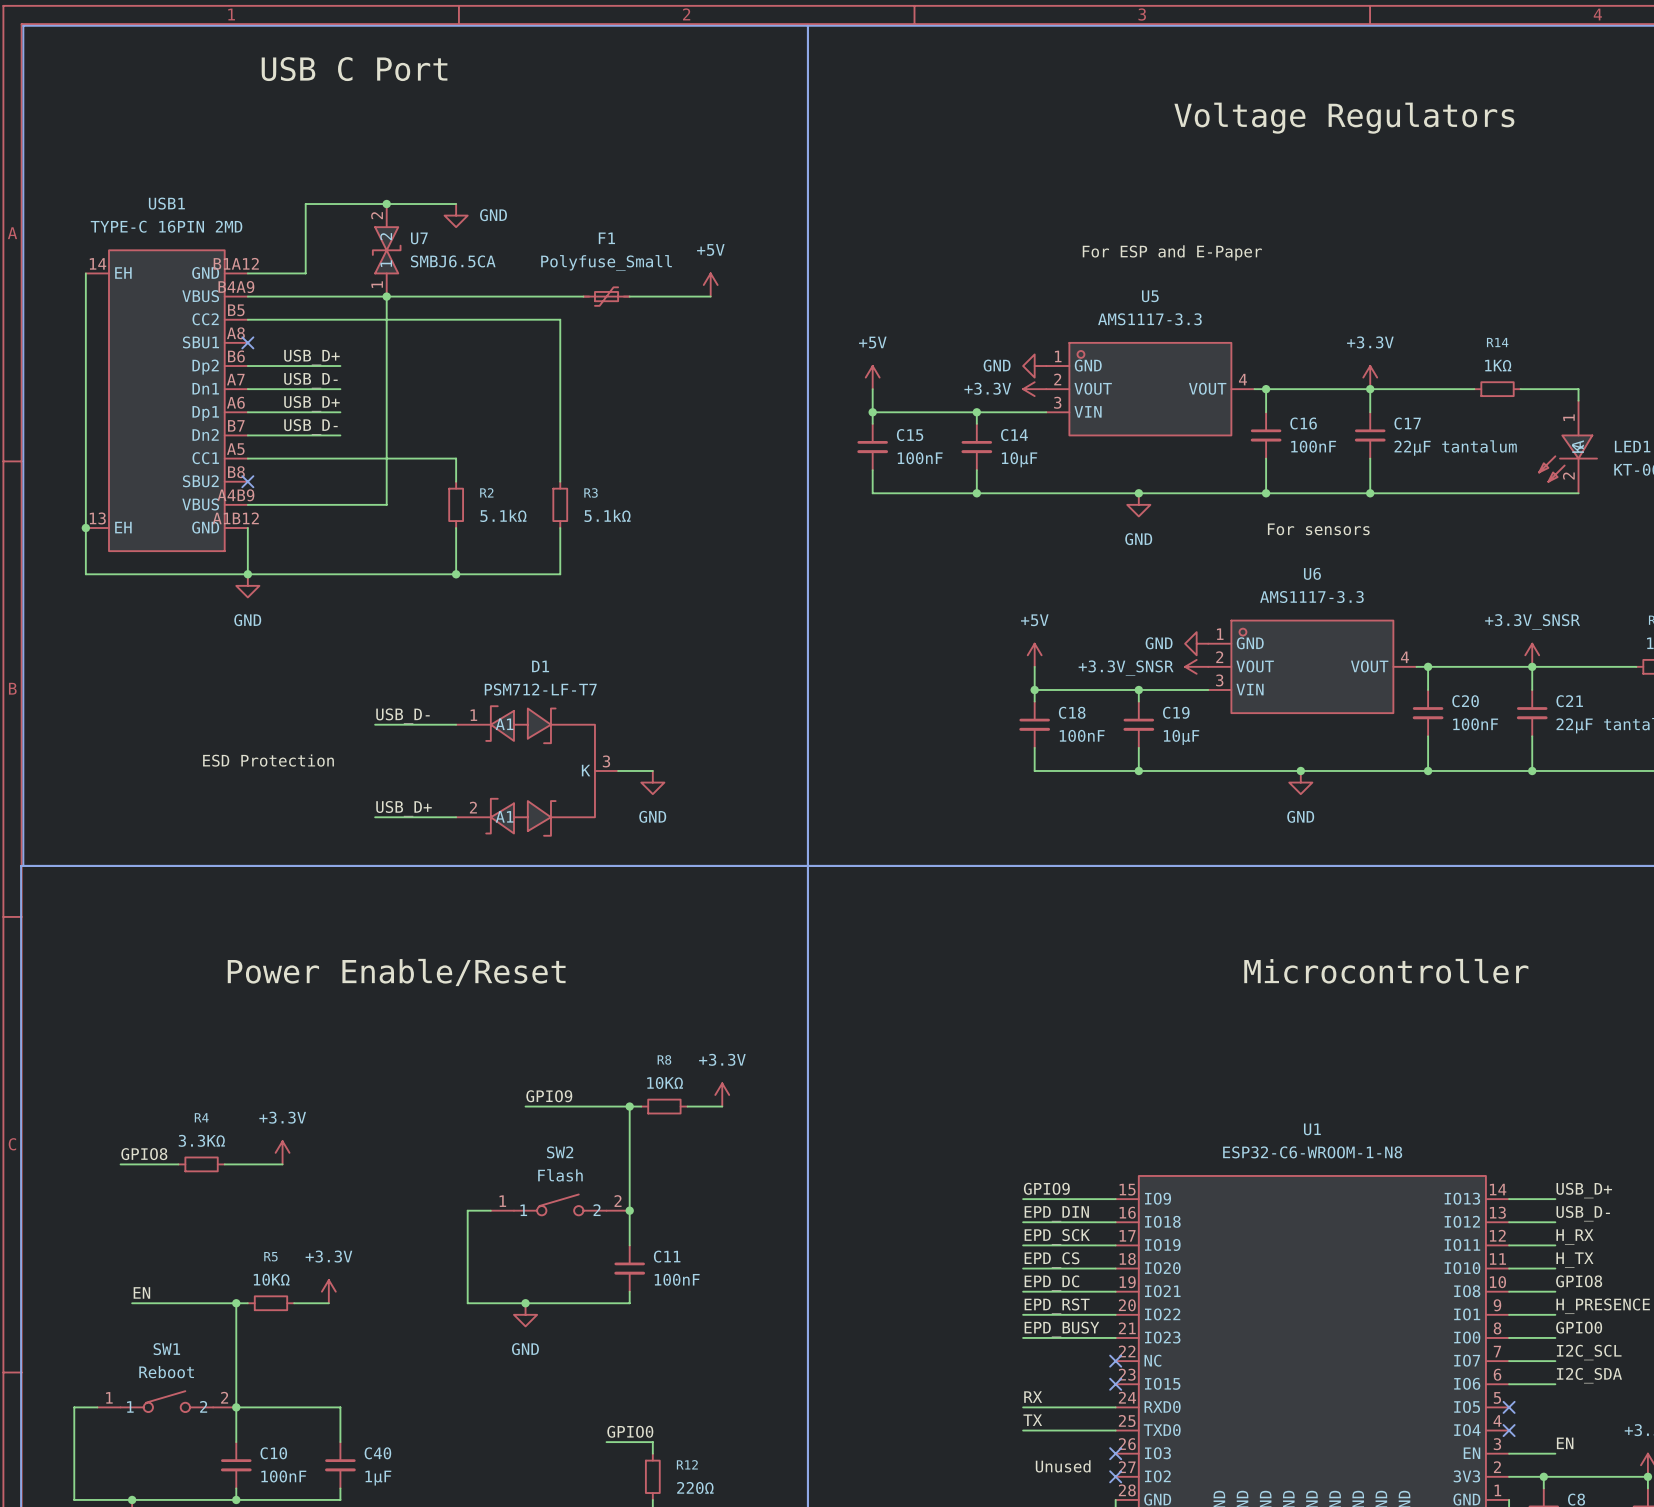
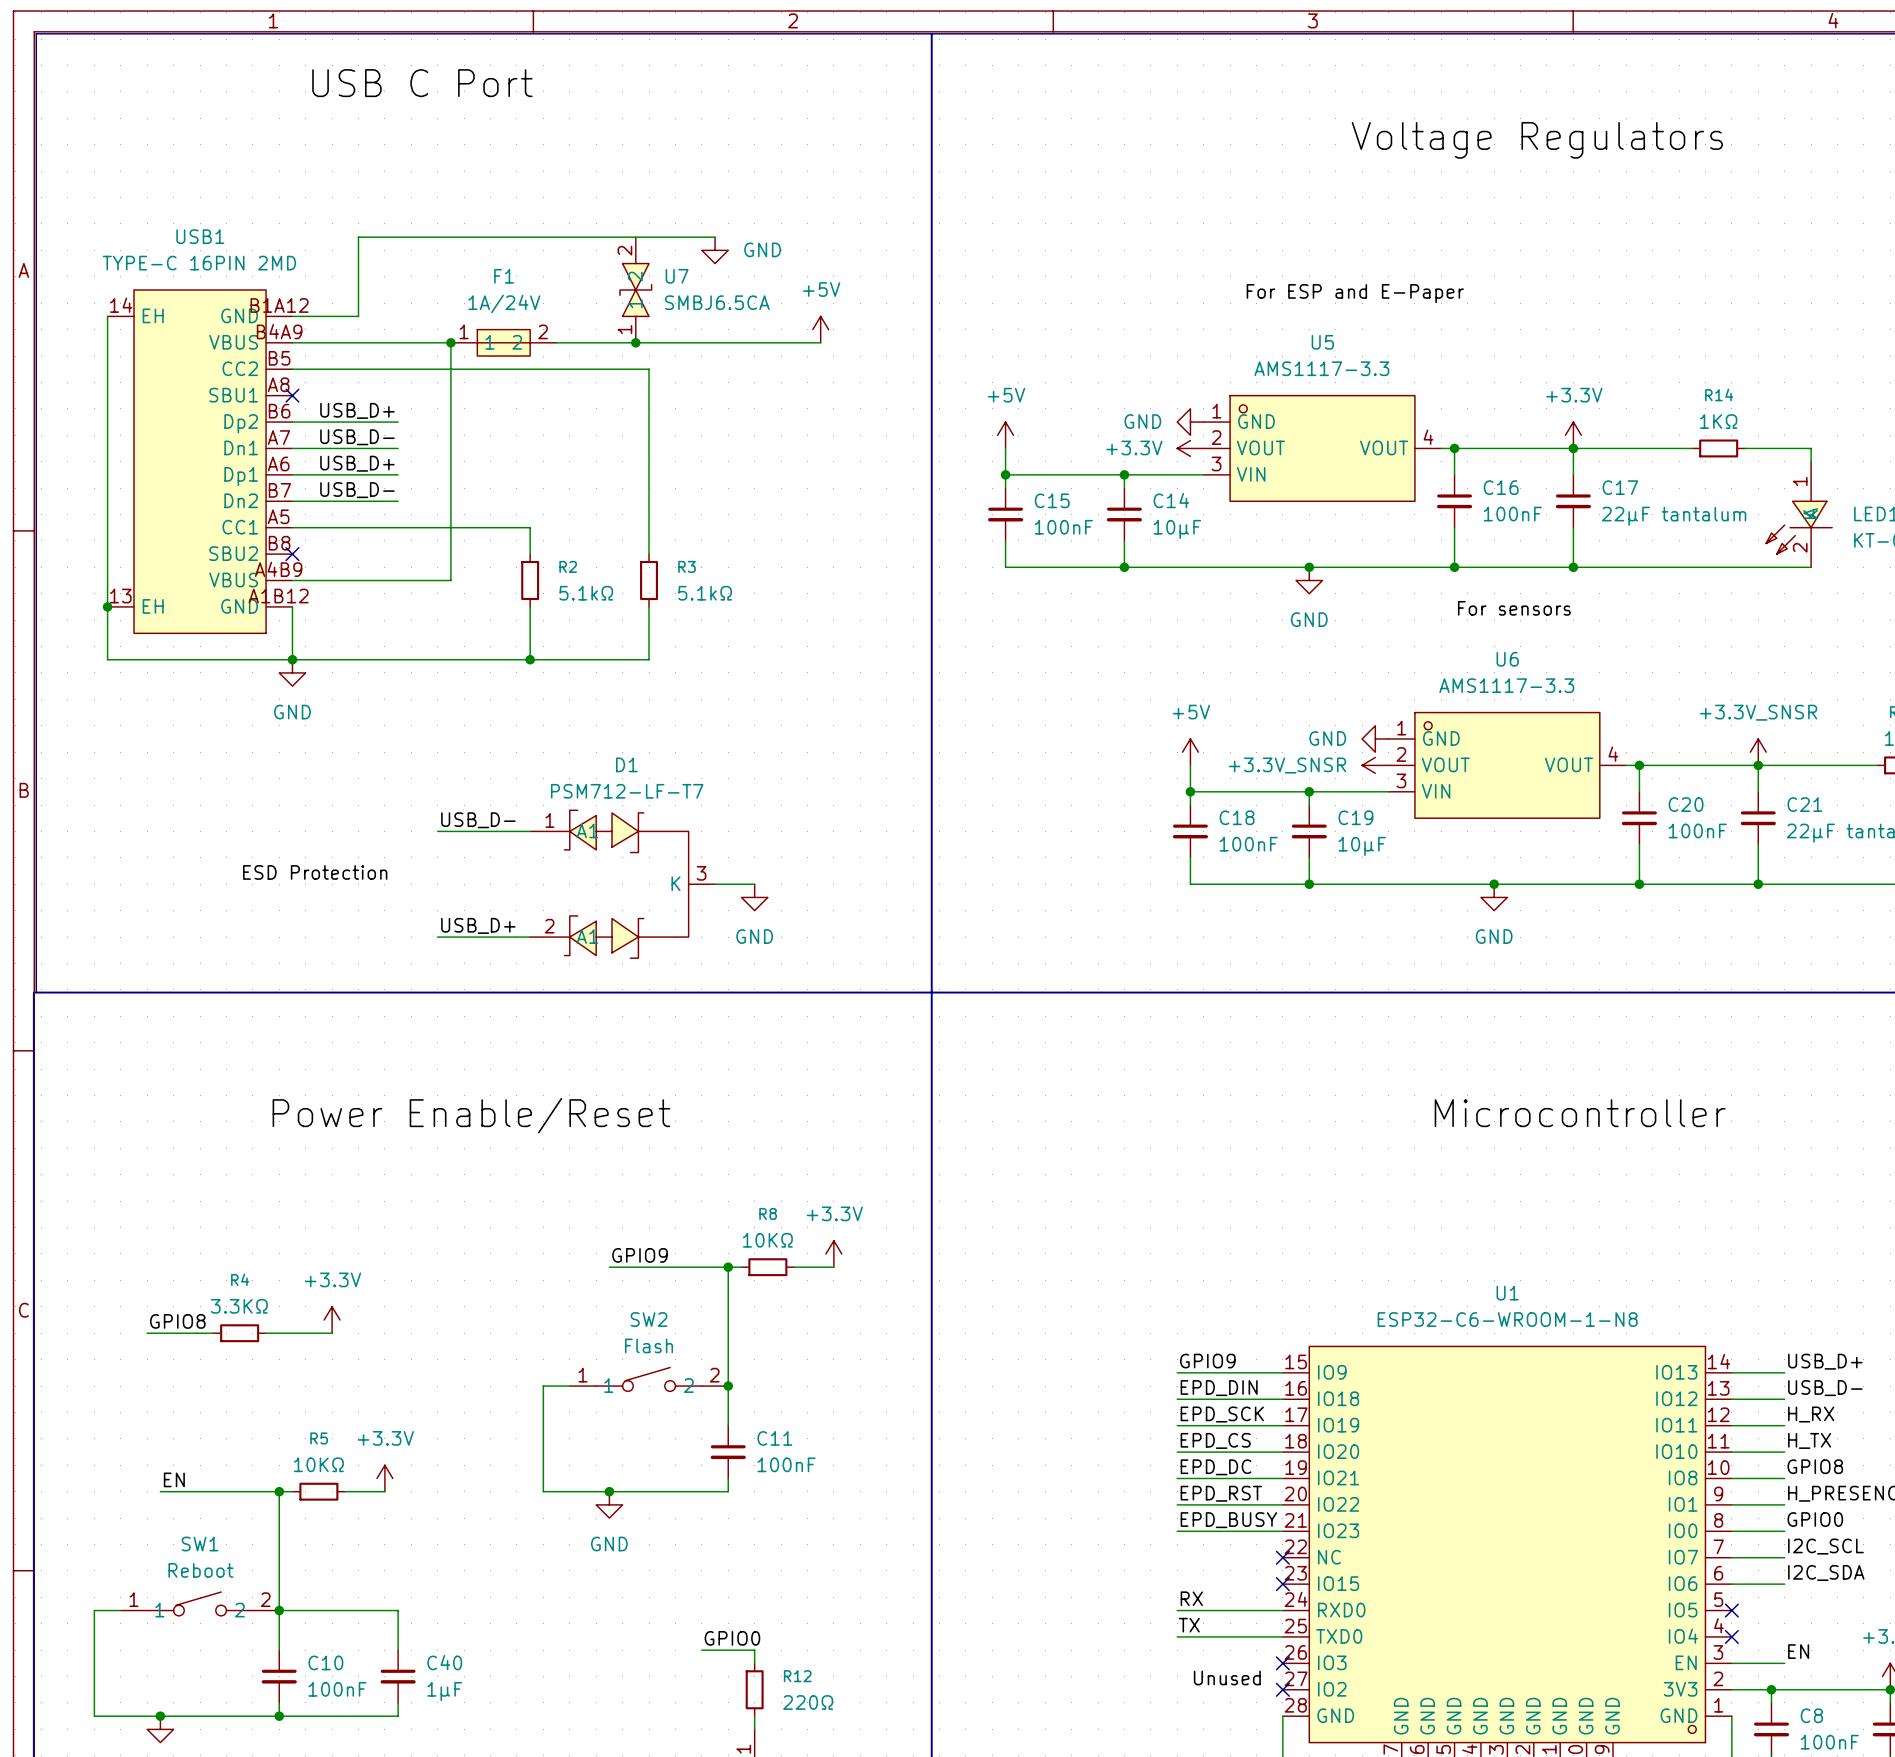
junction: (386, 204) -> none
wire: none -> (530, 237) (715, 237)
power symbol position: GND (456, 215) -> GND (715, 250)
U7 position: (386, 250) -> (635, 289)
F1 value: Polyfuse_Small (606, 263) -> 1A/24V (504, 303)
F1 symbol: [583, 287, 630, 306] -> [450, 329, 557, 357]
junction: none -> (635, 342)

